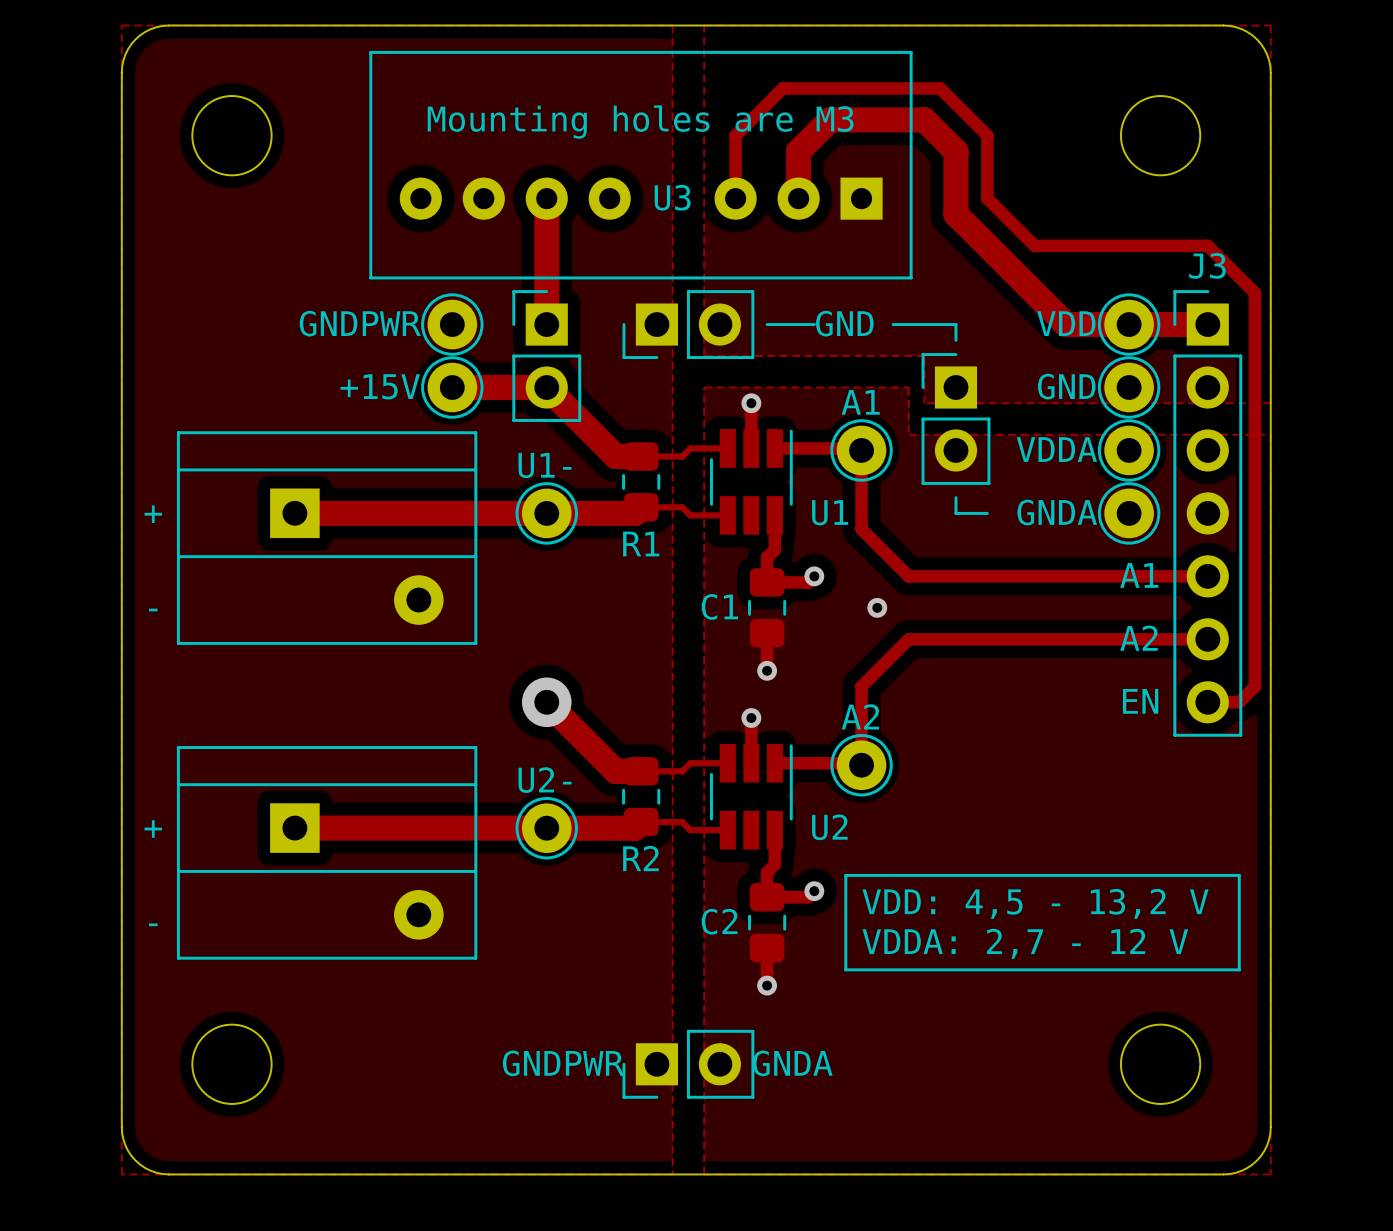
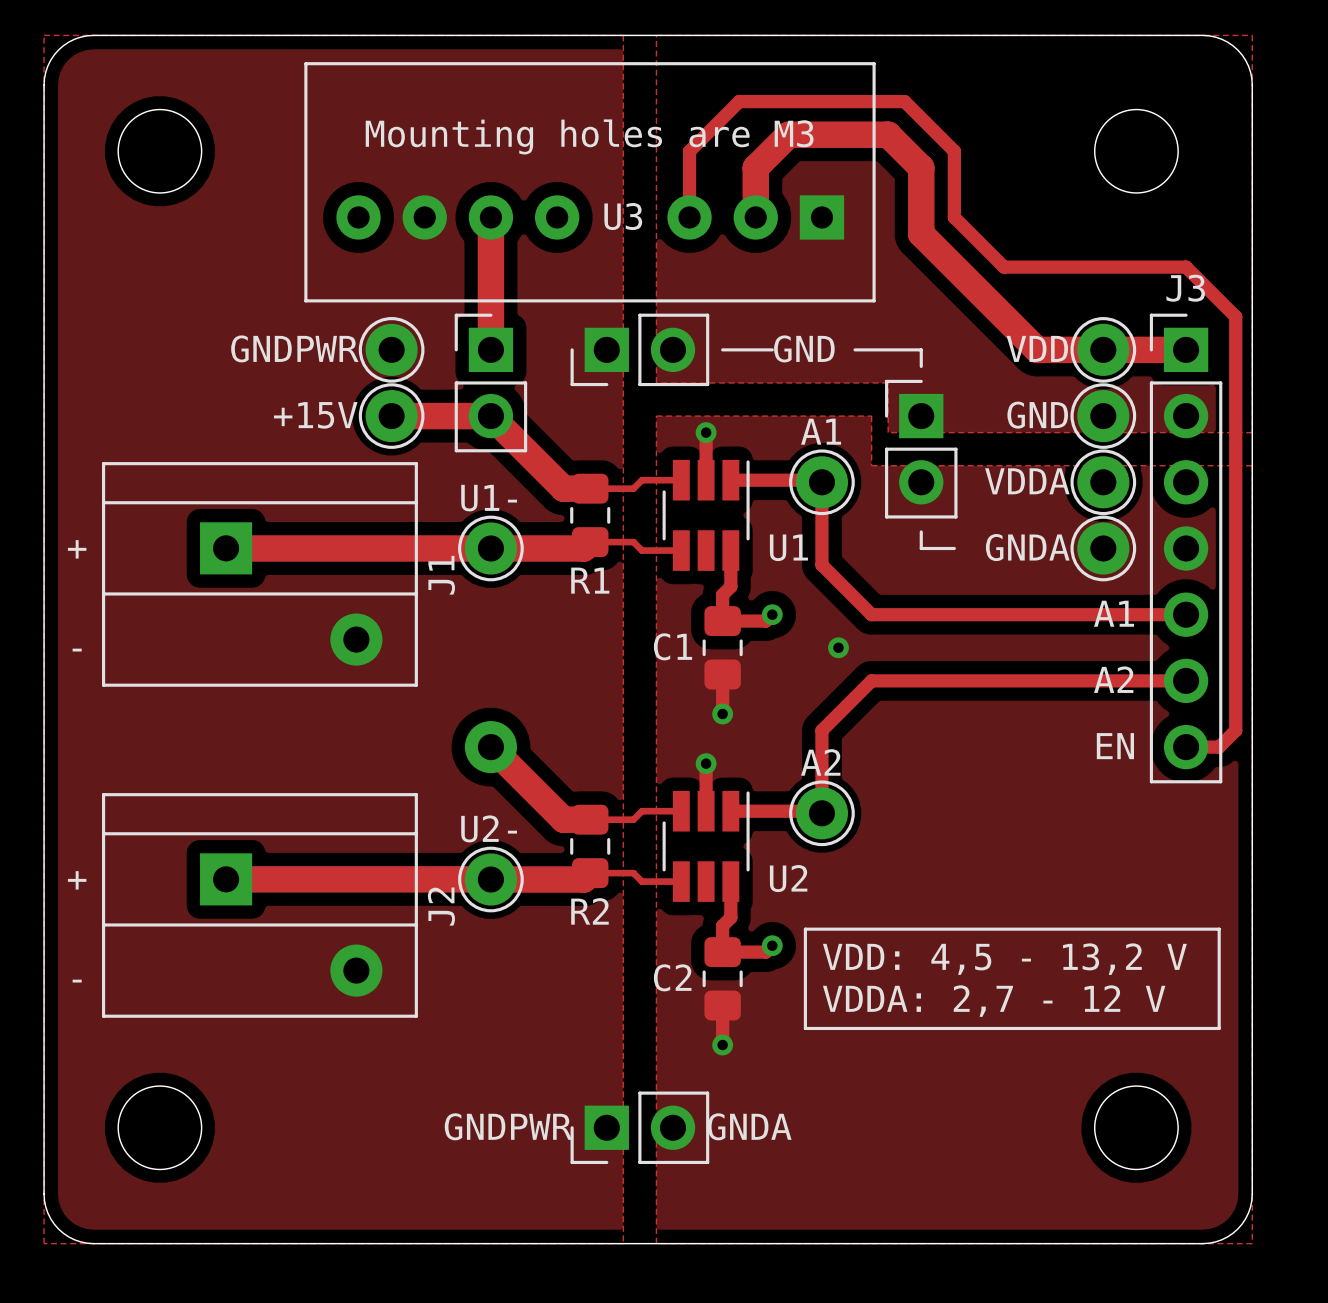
J1 name: none -> J1 (441, 575)
J2 name: none -> J2 (441, 906)

